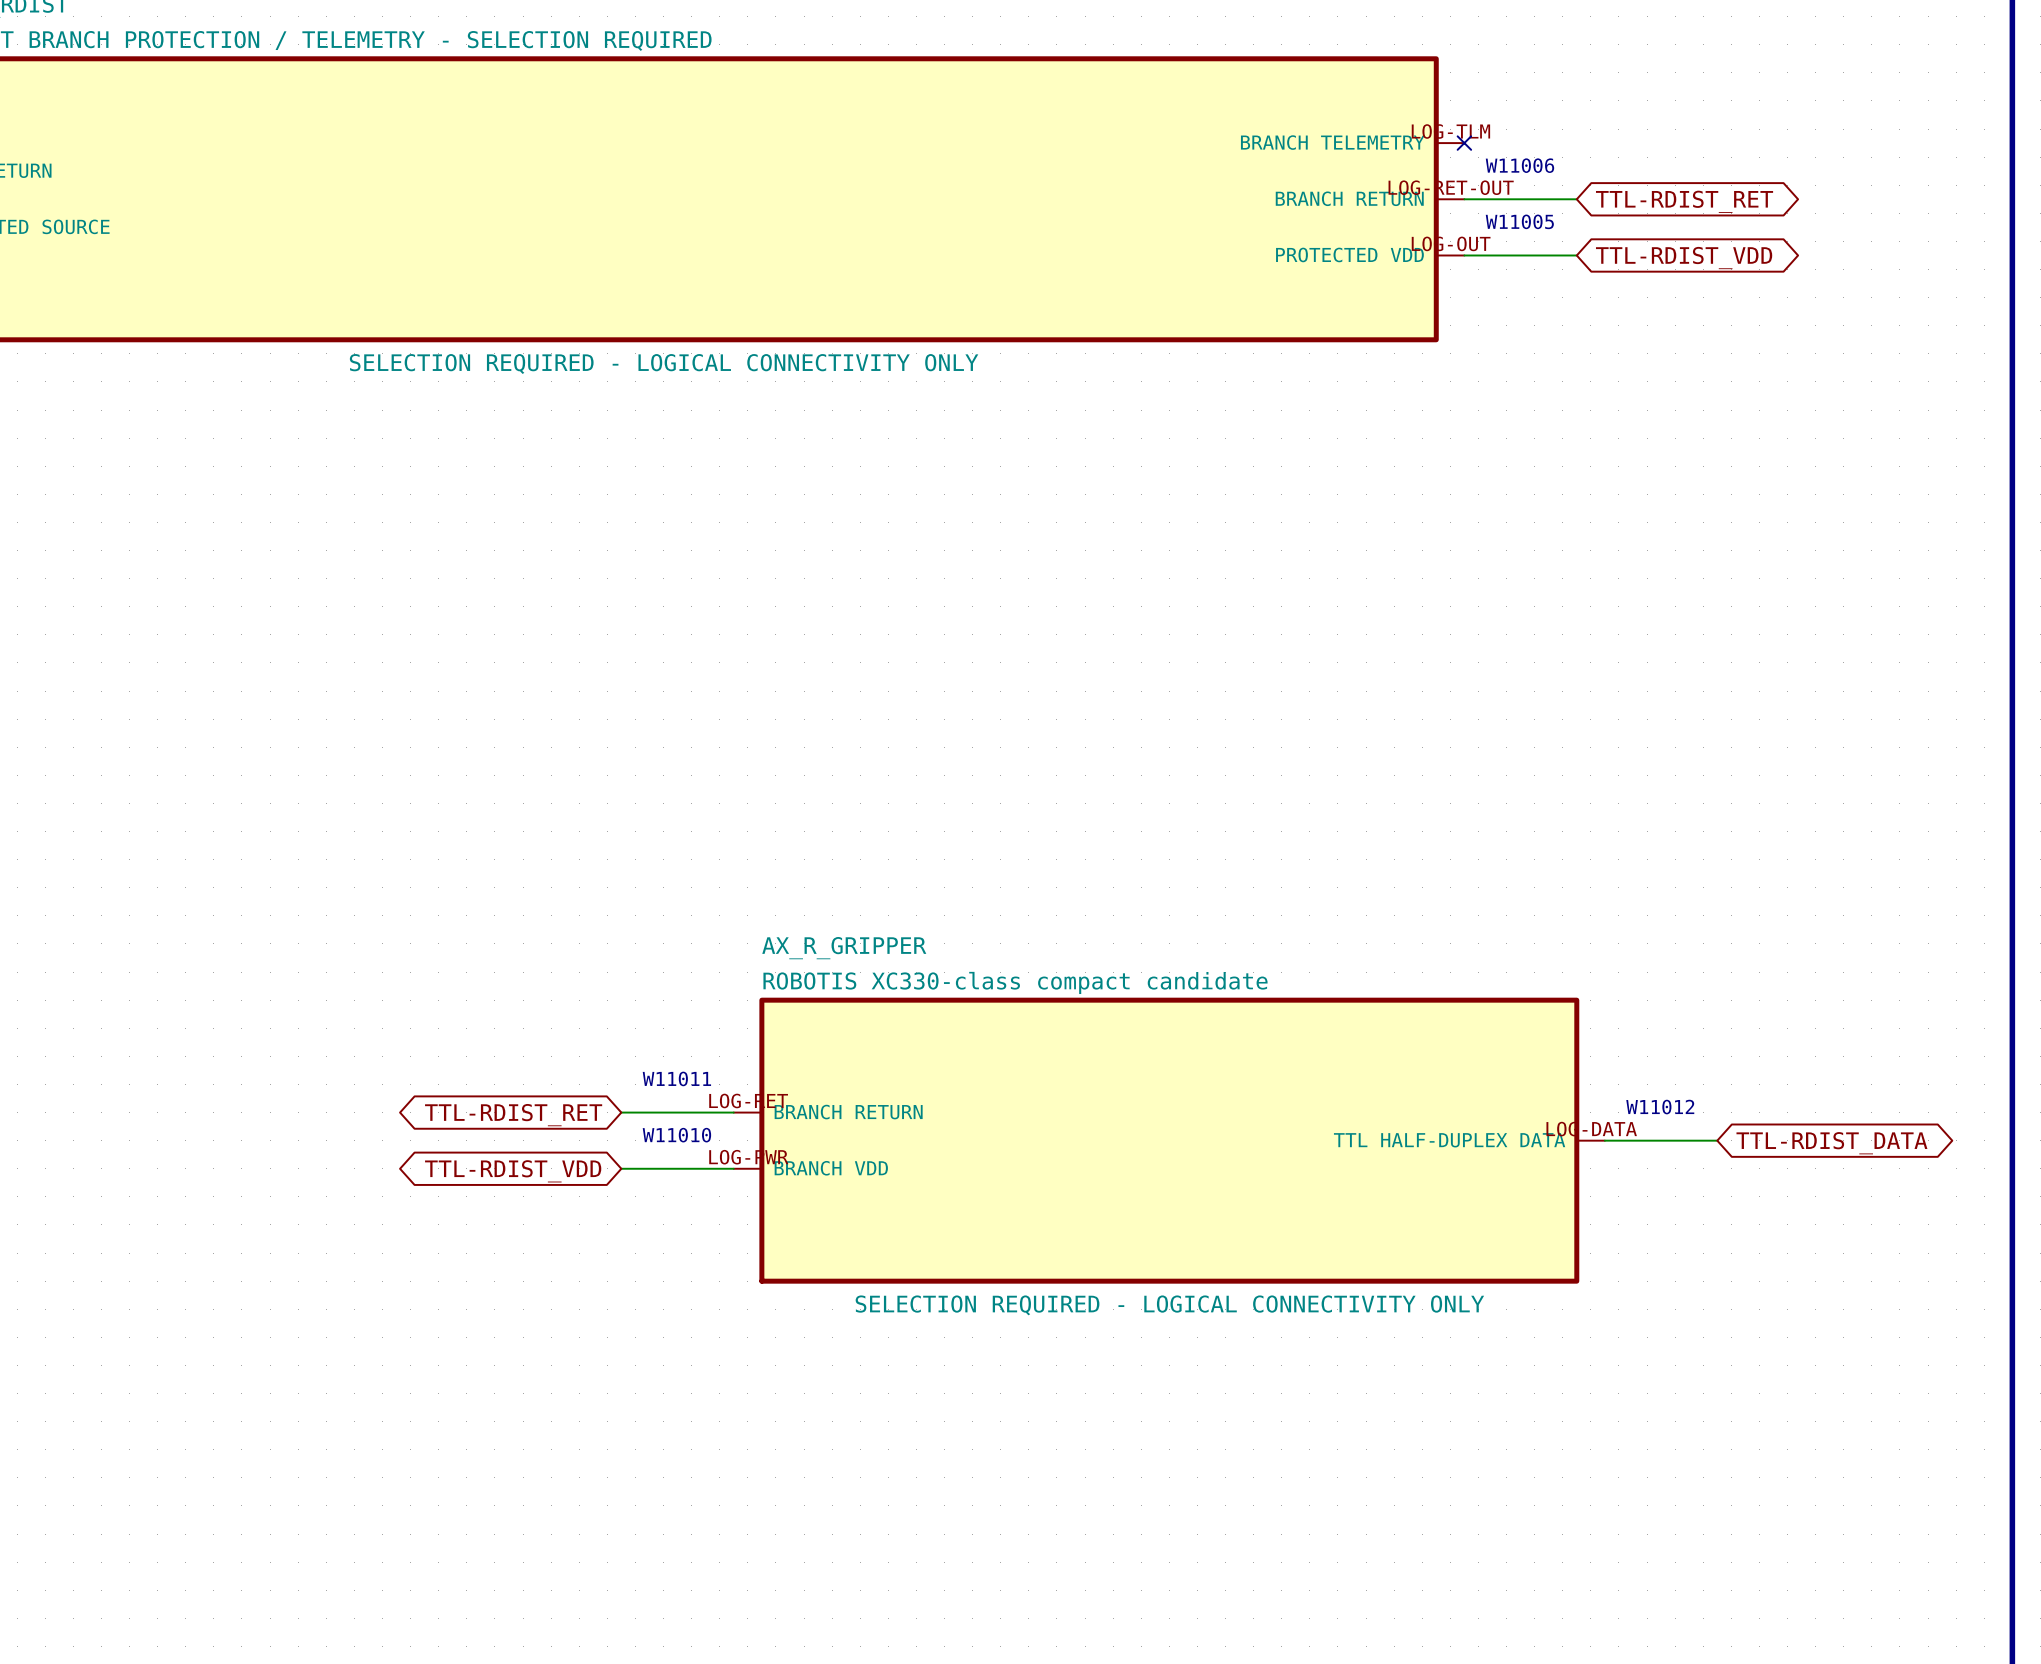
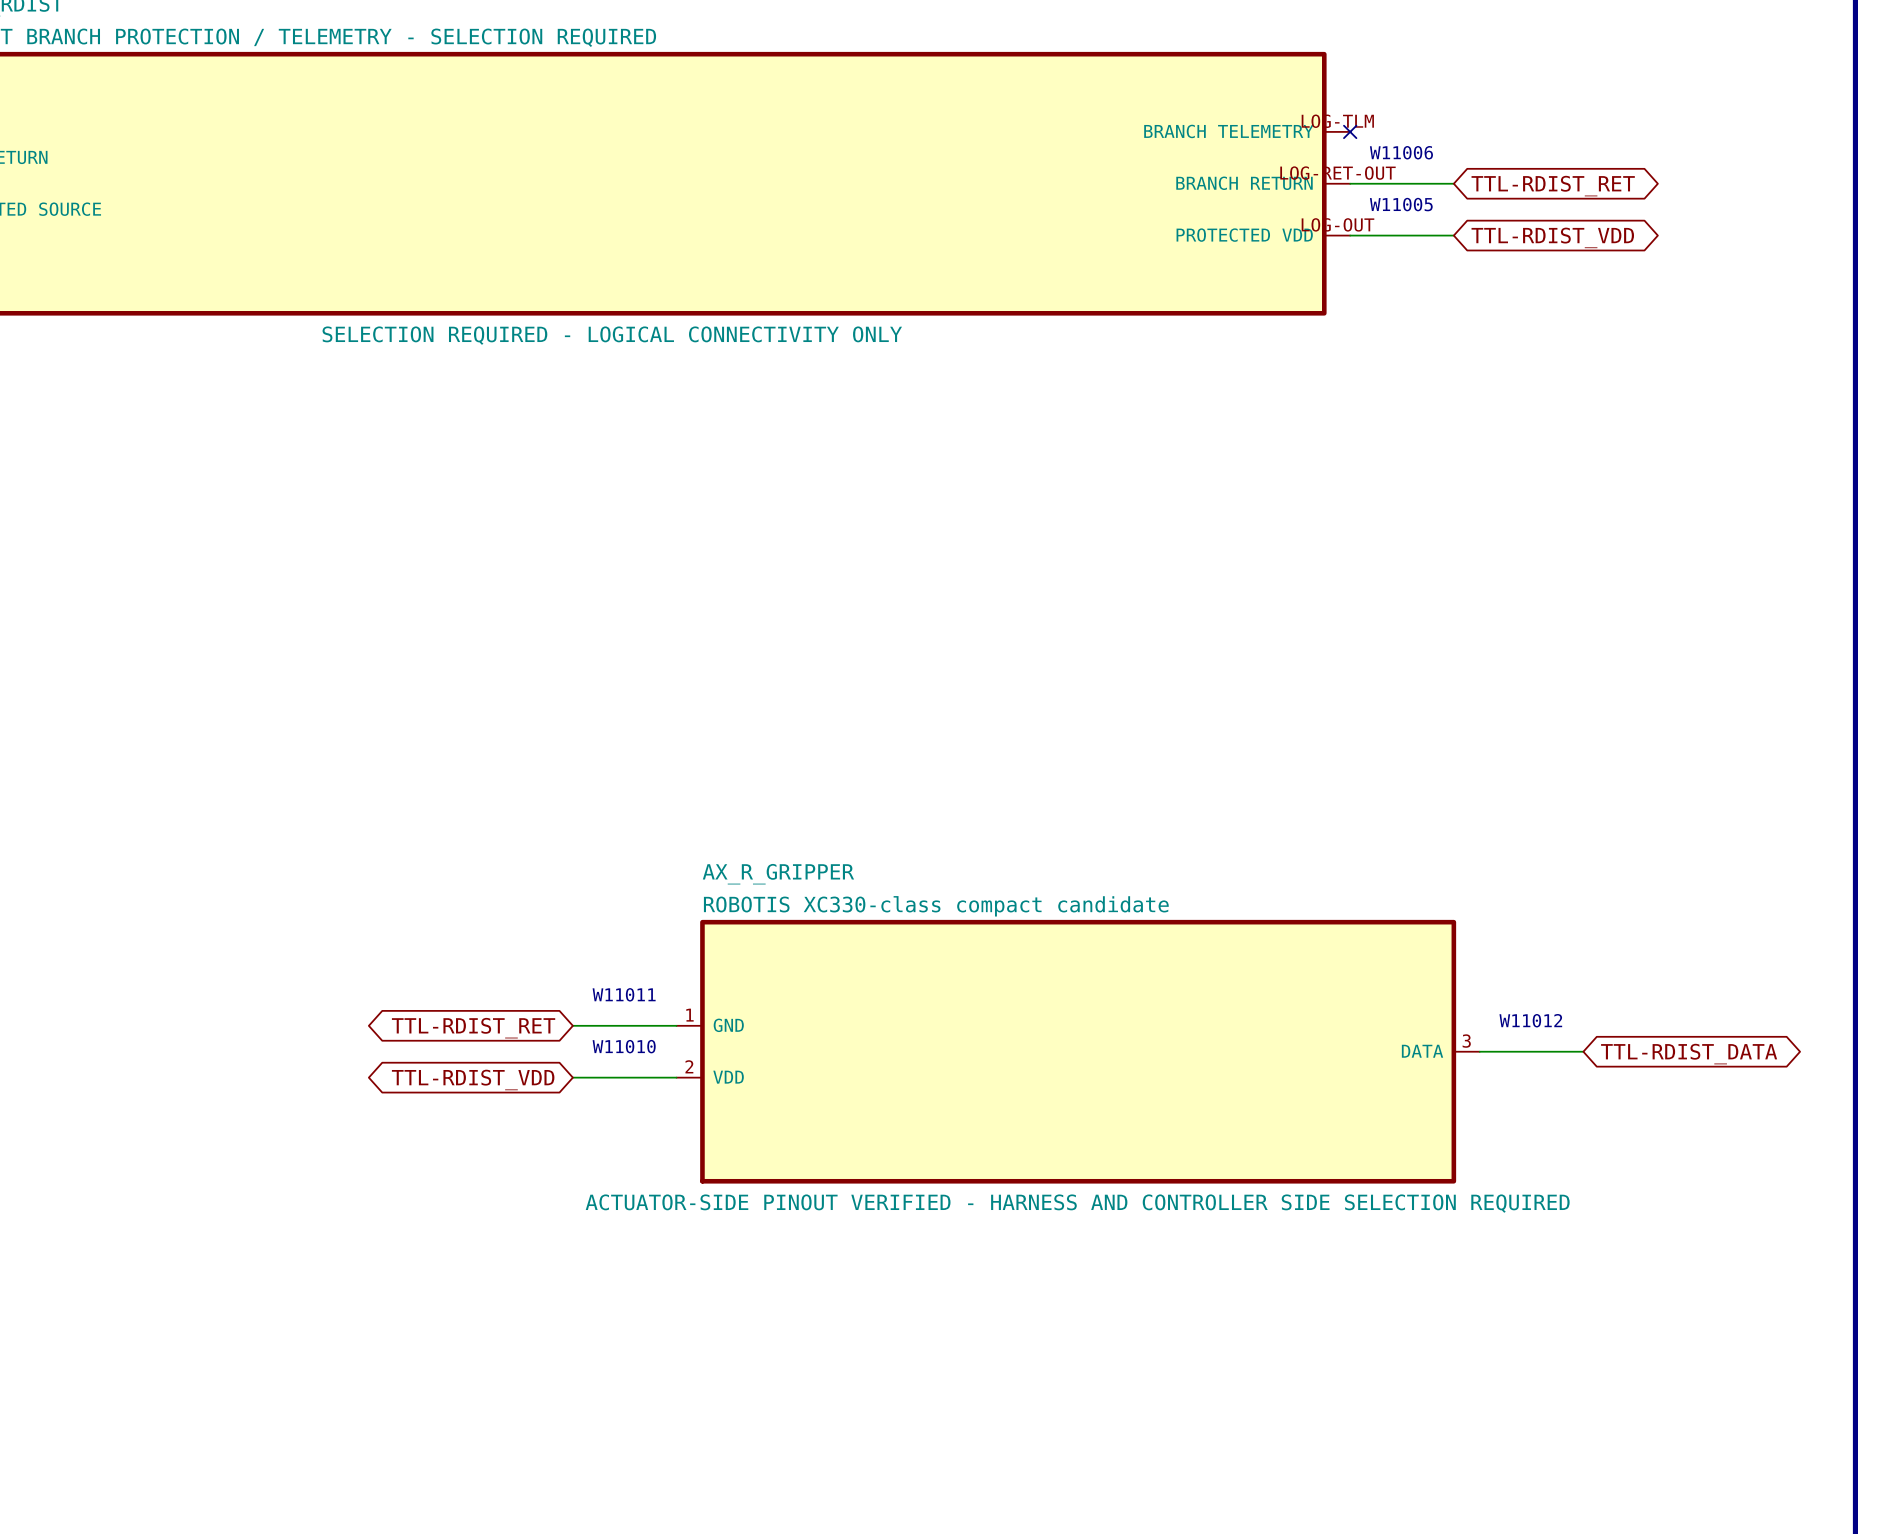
AX_R_GRIPPER pin number: LOG-RET (748, 1100) -> 1 (689, 1015)
AX_R_GRIPPER pin name: BRANCH RETURN (848, 1112) -> GND (728, 1025)
AX_R_GRIPPER pin number: LOG-DATA (1591, 1129) -> 3 (1466, 1041)
AX_R_GRIPPER pin name: TTL HALF-DUPLEX DATA (1449, 1140) -> DATA (1422, 1051)
AX_R_GRIPPER pin number: LOG-PWR (748, 1157) -> 2 (689, 1066)
AX_R_GRIPPER pin name: BRANCH VDD (831, 1168) -> VDD (728, 1077)
AX_R_GRIPPER text: SELECTION REQUIRED - LOGICAL CONNECTIVITY ONLY (1169, 1305) -> ACTUATOR-SIDE PINOUT VERIFIED - HARNESS AND CONTROLLER SIDE SELECTION REQUIRED (1077, 1203)

